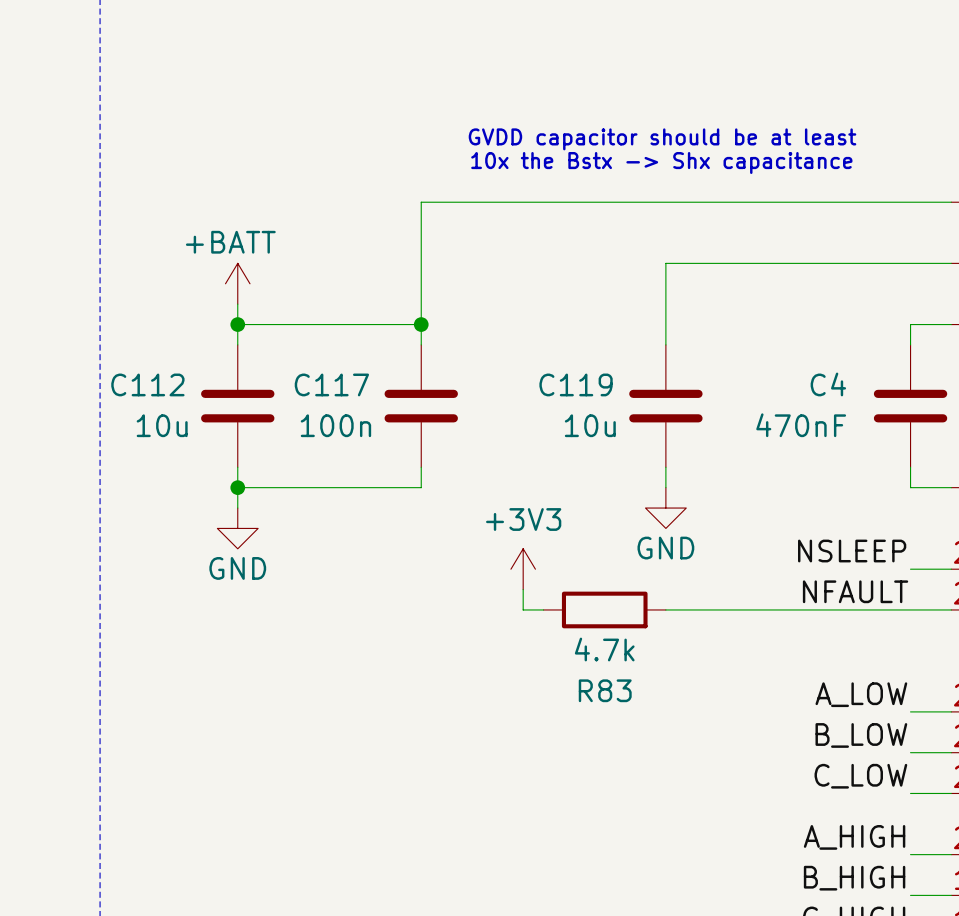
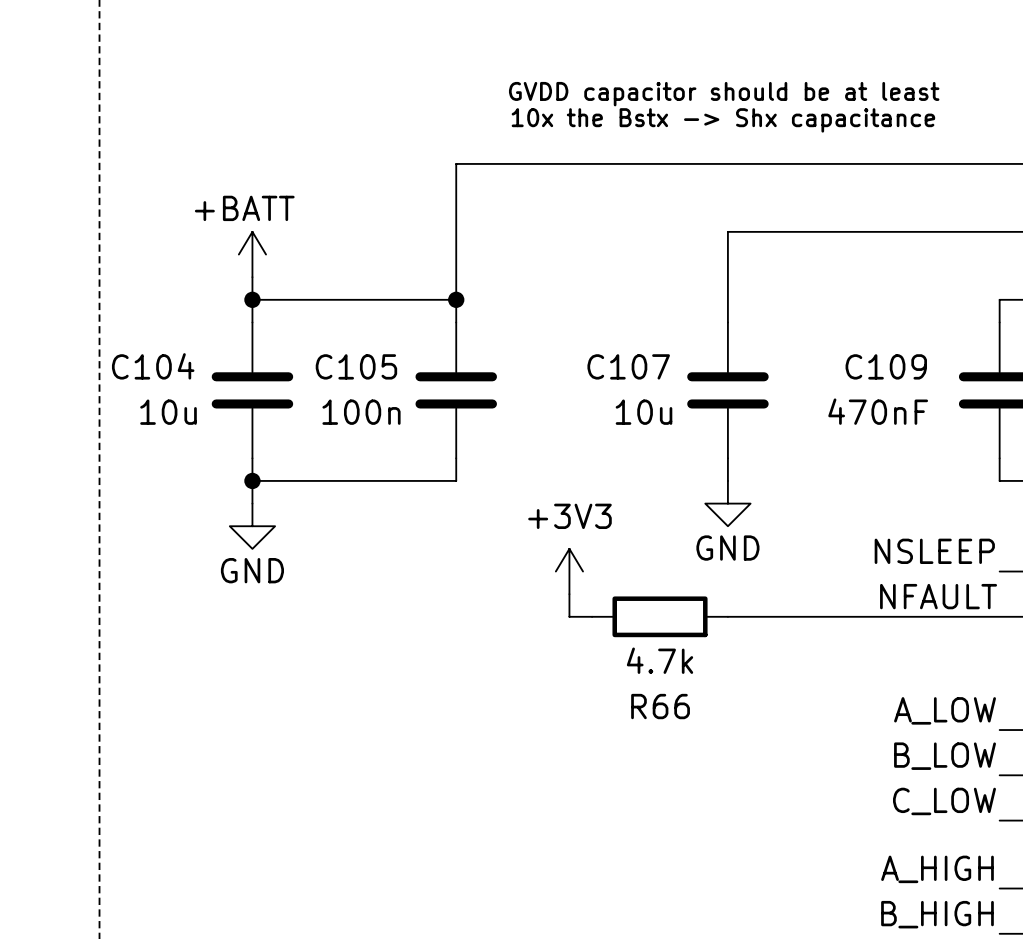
C112 name: C112 (147, 384) -> C104 (153, 366)
C117 name: C117 (331, 384) -> C105 (356, 366)
C119 name: C119 (576, 384) -> C107 (628, 366)
C4 name: C4 (828, 384) -> C109 (886, 366)
R83 name: R83 (605, 690) -> R66 (660, 706)

